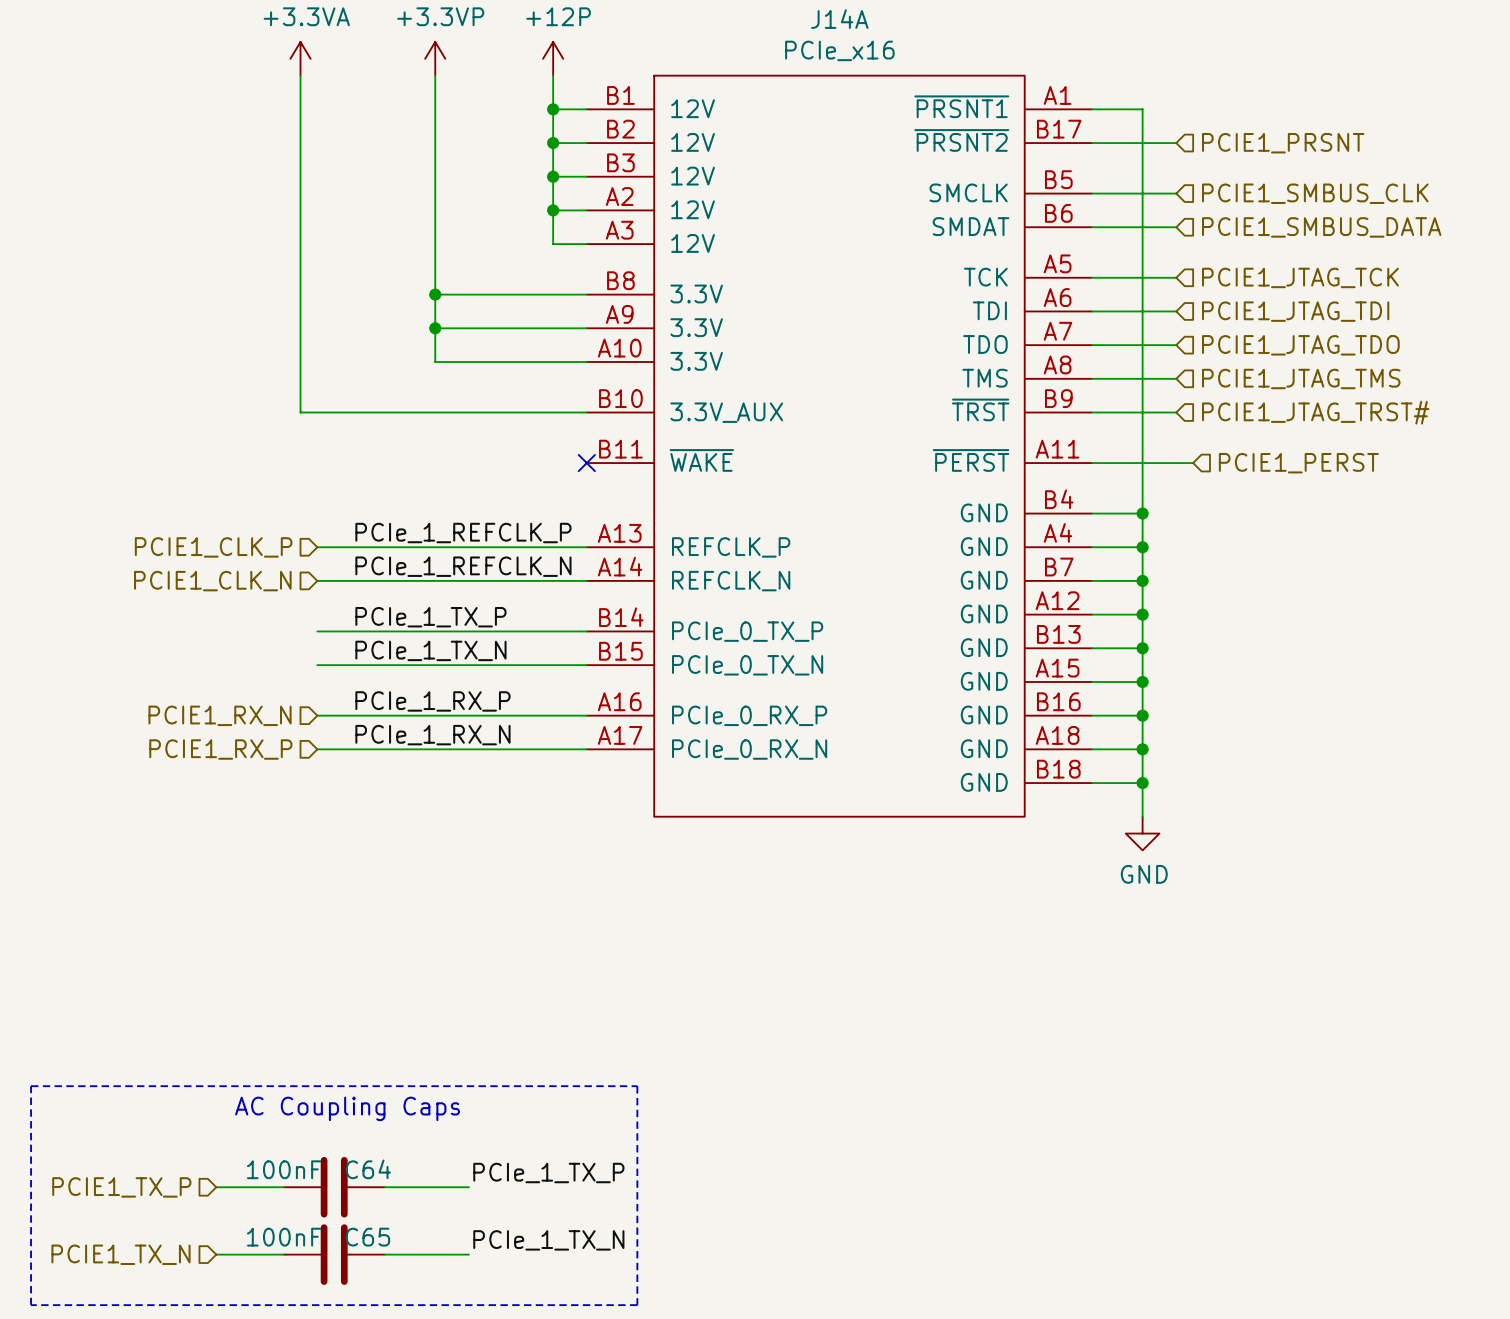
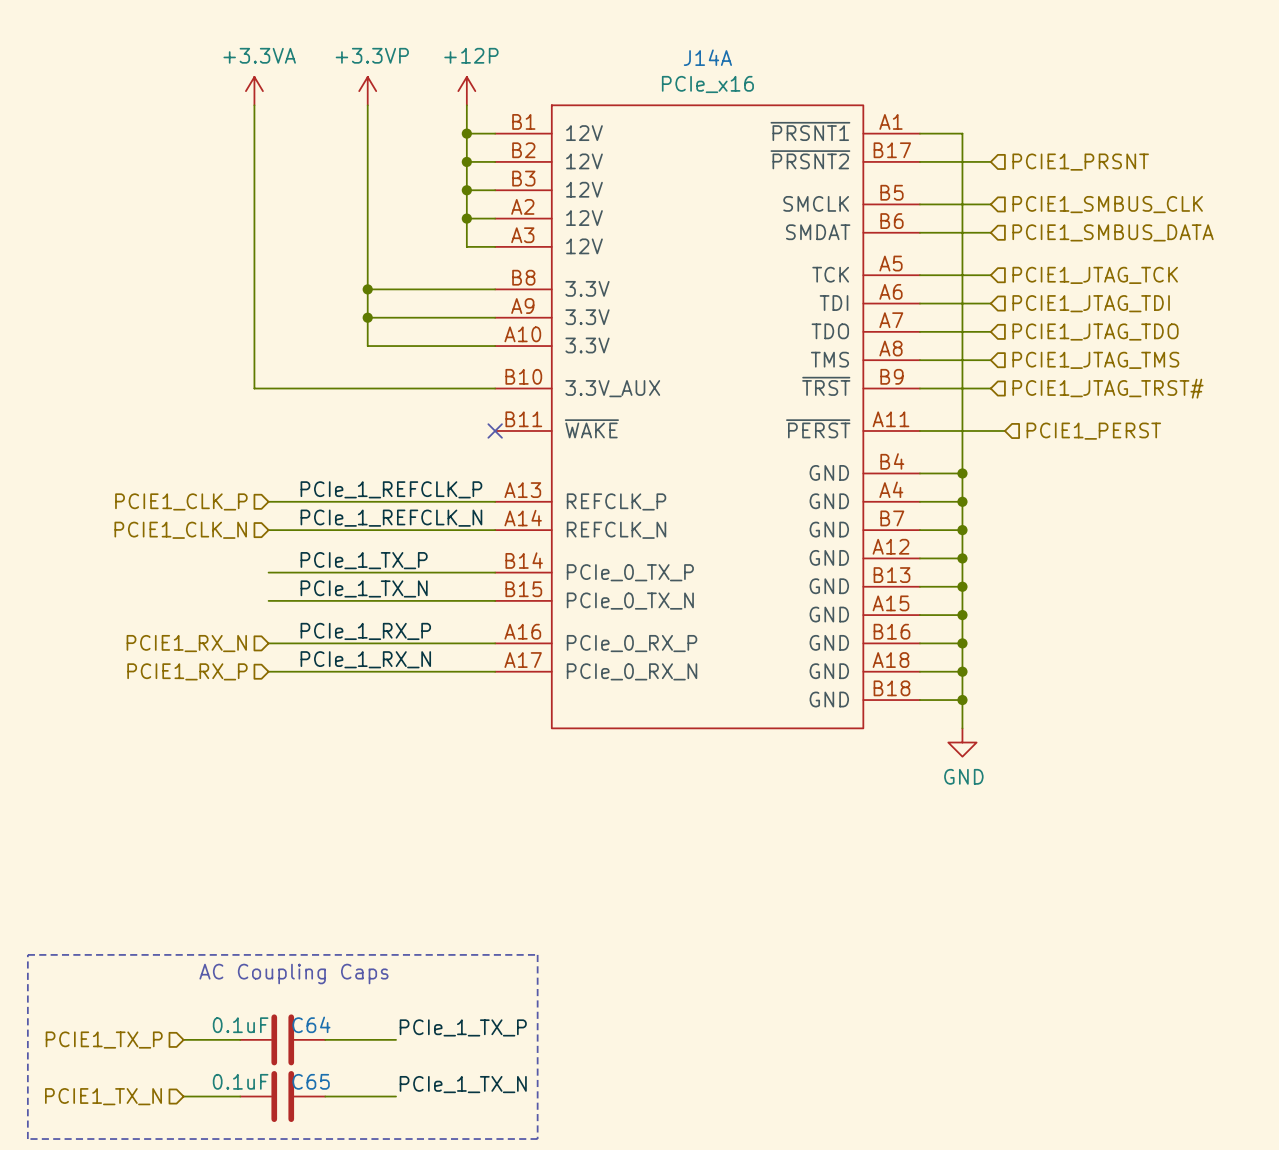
C64 value: 100nF (284, 1169) -> 0.1uF (240, 1025)
C65 value: 100nF (284, 1237) -> 0.1uF (240, 1081)

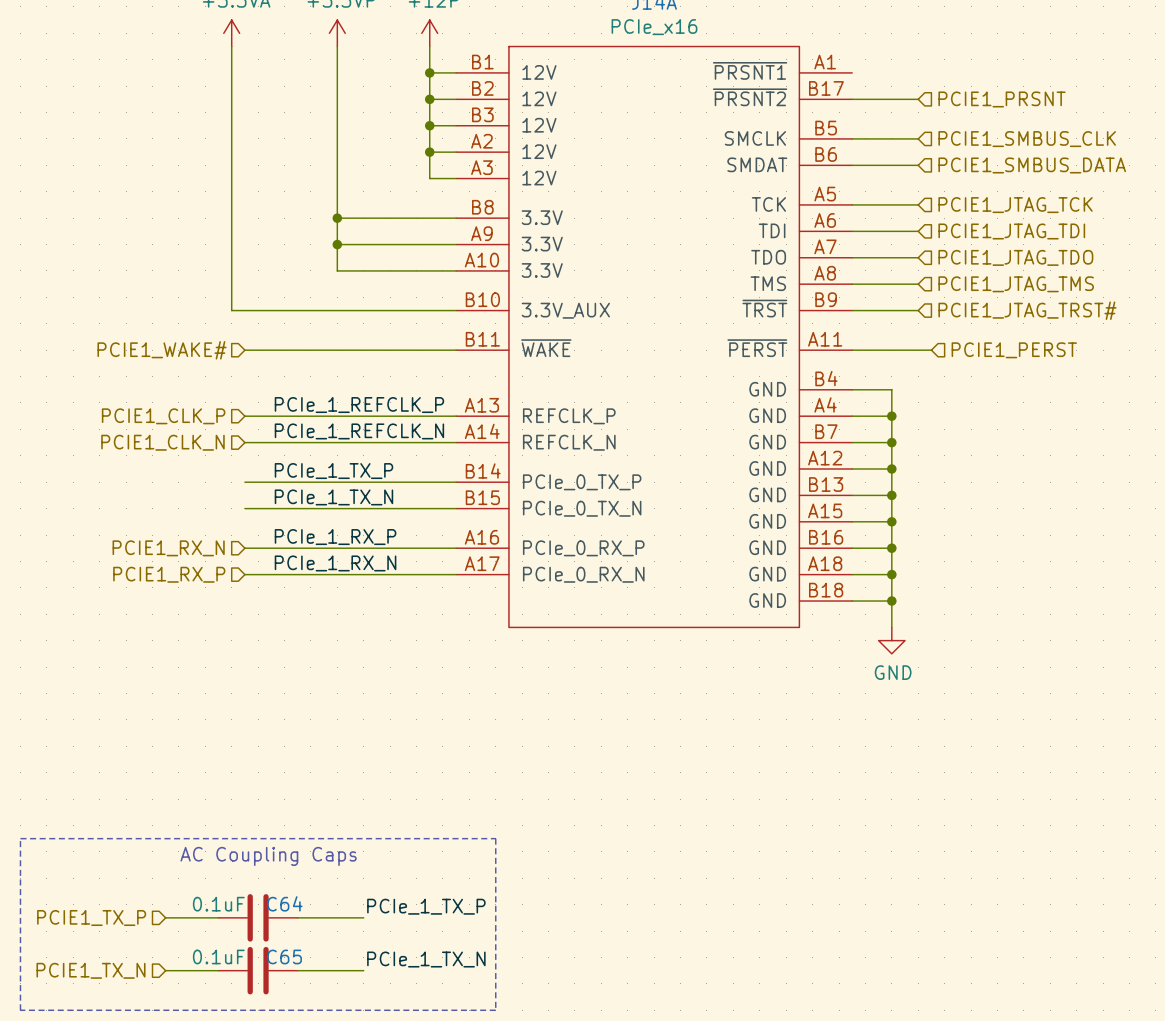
wire: (919, 133) (962, 133) (962, 473) -> none
wire: none -> (244, 350) (456, 350)
no-connect mark: (495, 430) -> none
hierarchical label: none -> PCIE1_WAKE# (162, 350)
junction: (962, 473) -> none

